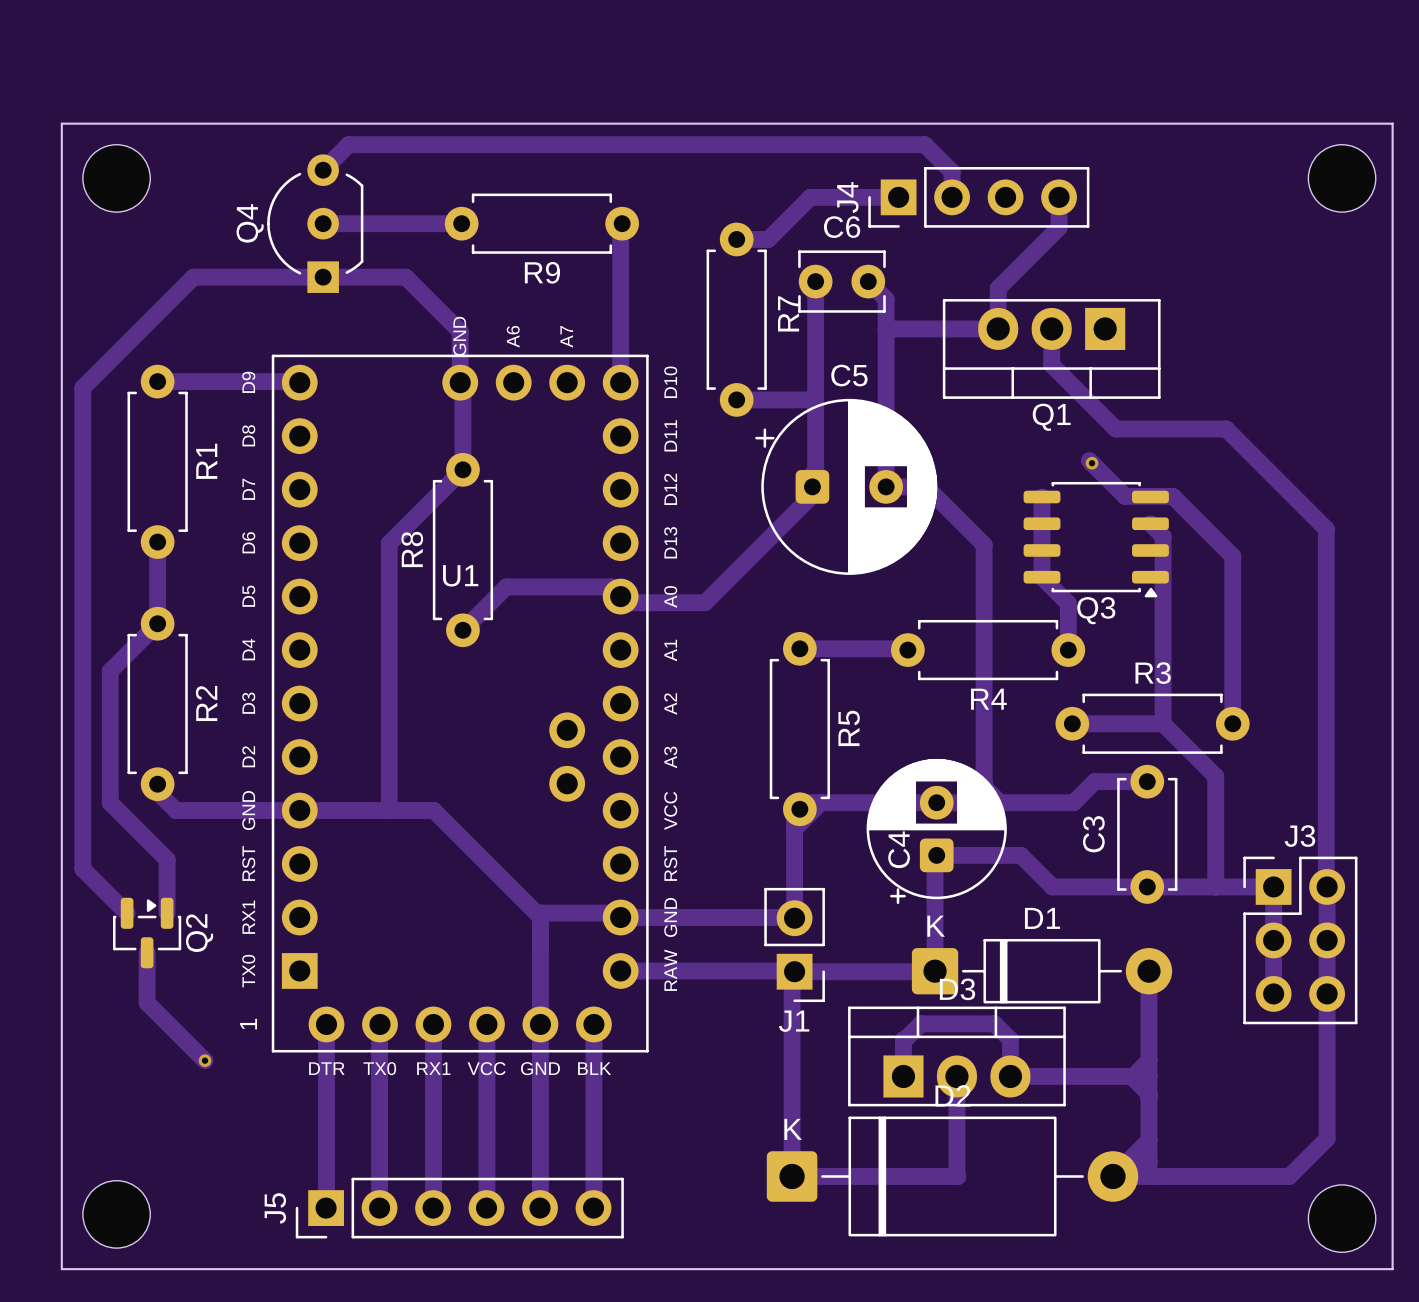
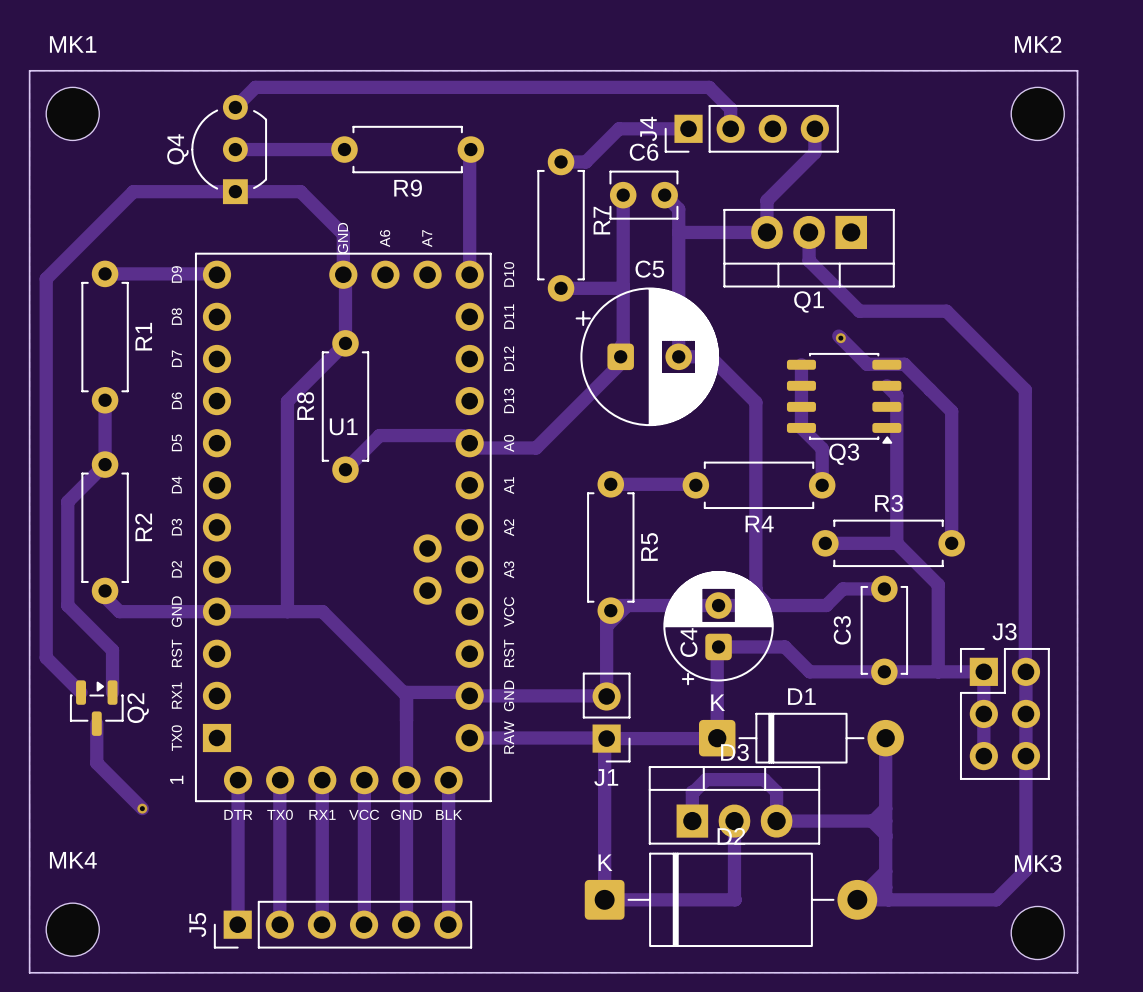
MK1 name: none -> MK1 (73, 44)
MK2 name: none -> MK2 (1038, 44)
MK4 name: none -> MK4 (73, 860)
MK3 name: none -> MK3 (1038, 863)

